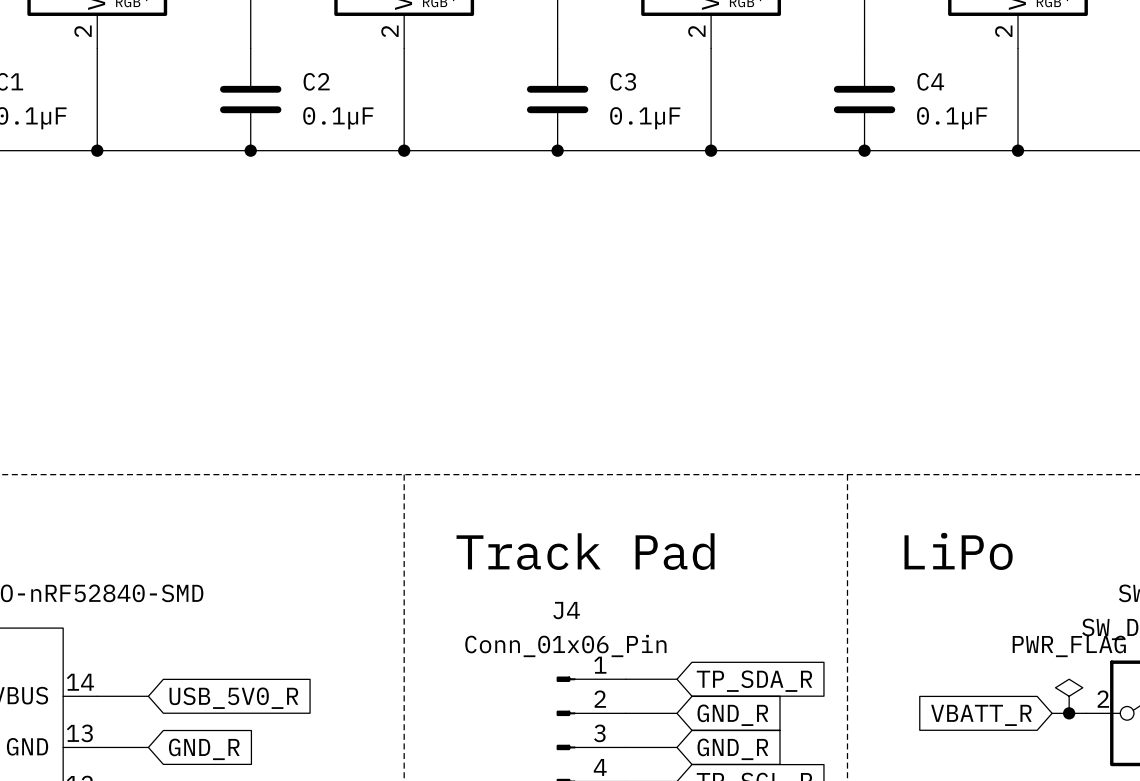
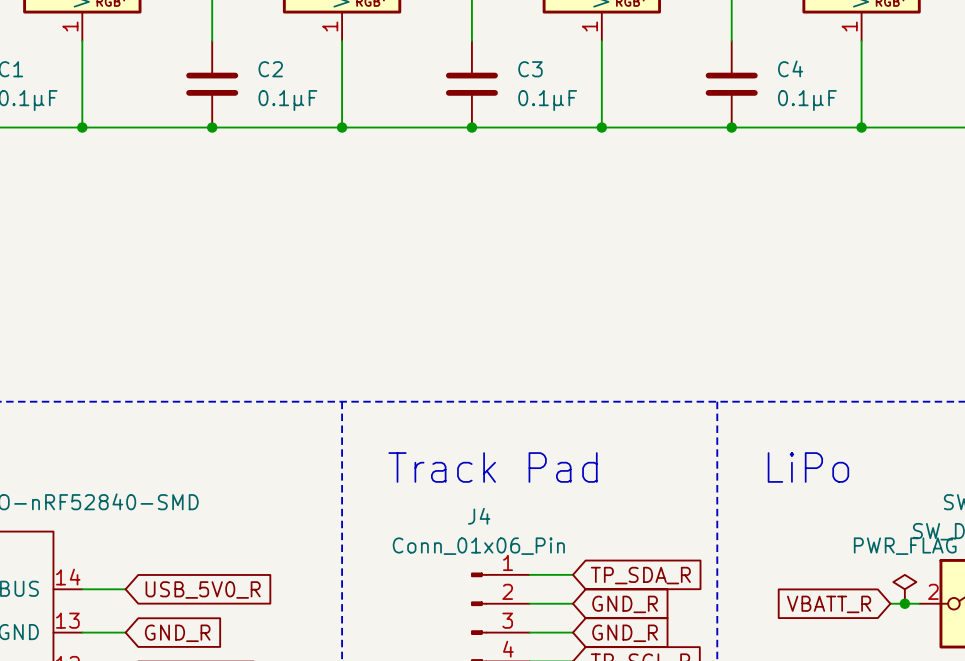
part pin number: 2 (83, 31) -> 1 (70, 26)
part pin number: 2 (389, 31) -> 1 (330, 26)
part pin number: 2 (696, 31) -> 1 (589, 26)
part pin number: 2 (1003, 31) -> 1 (849, 26)

